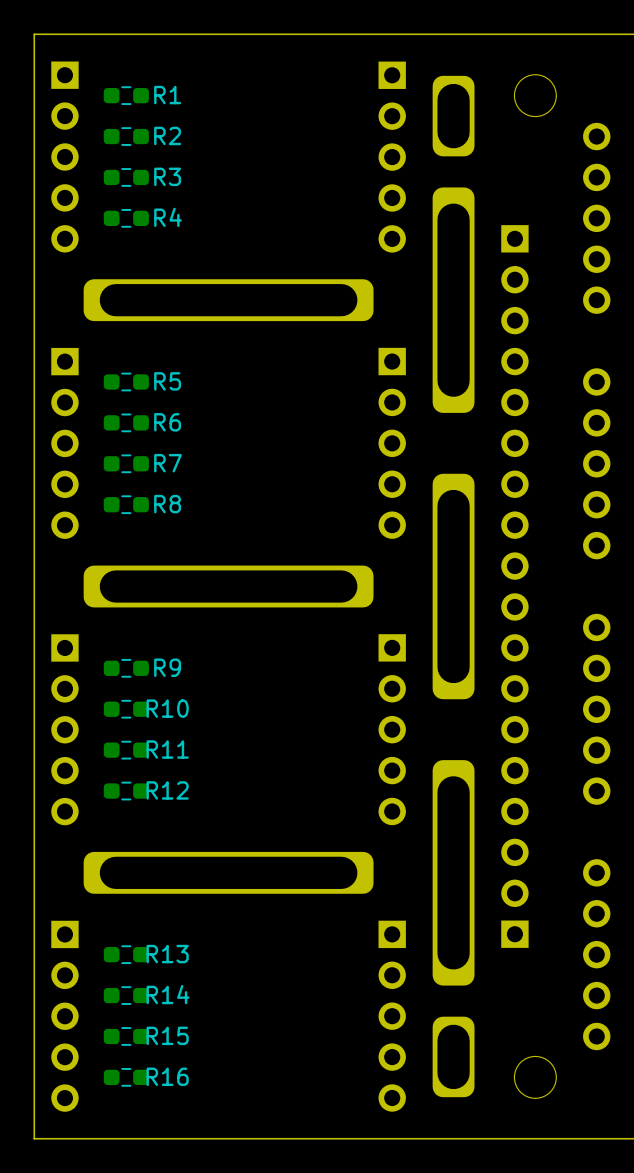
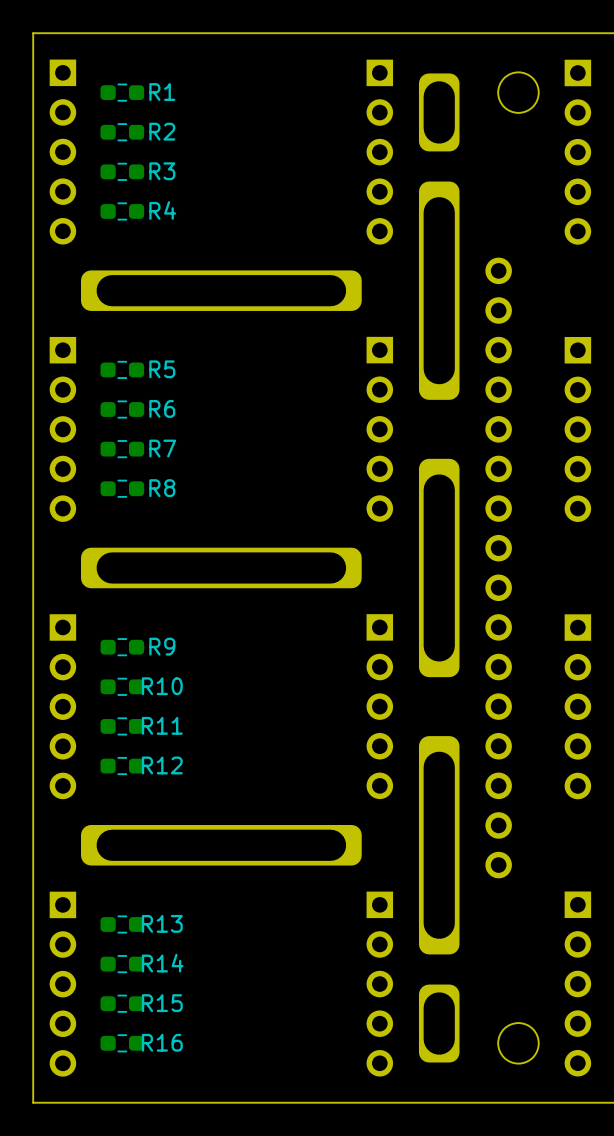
part: none -> (577, 152)
part: (596, 218) -> none
part: (514, 238) -> none
part: none -> (577, 429)
part: (596, 463) -> none
part: (596, 709) -> none
part: none -> (577, 706)
part: (514, 934) -> none
part: (596, 954) -> none
part: none -> (577, 983)

